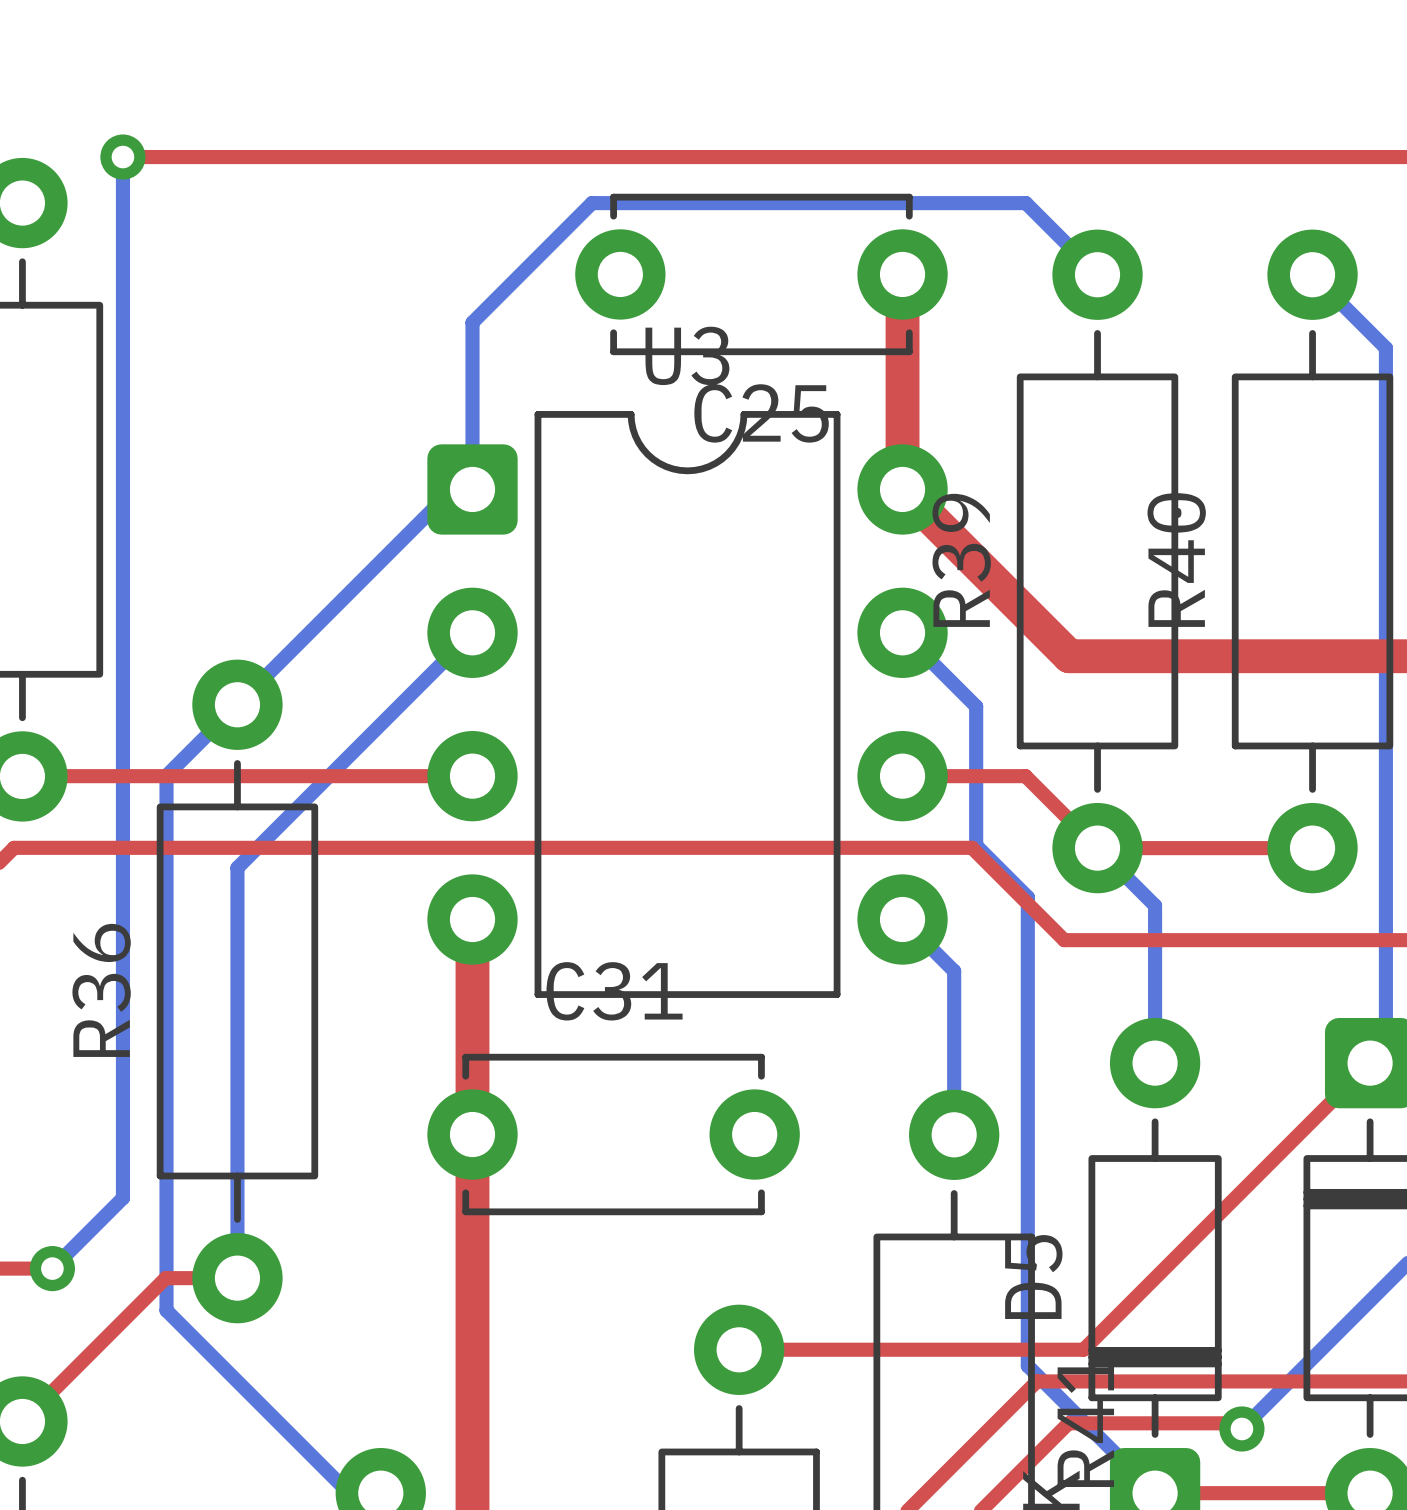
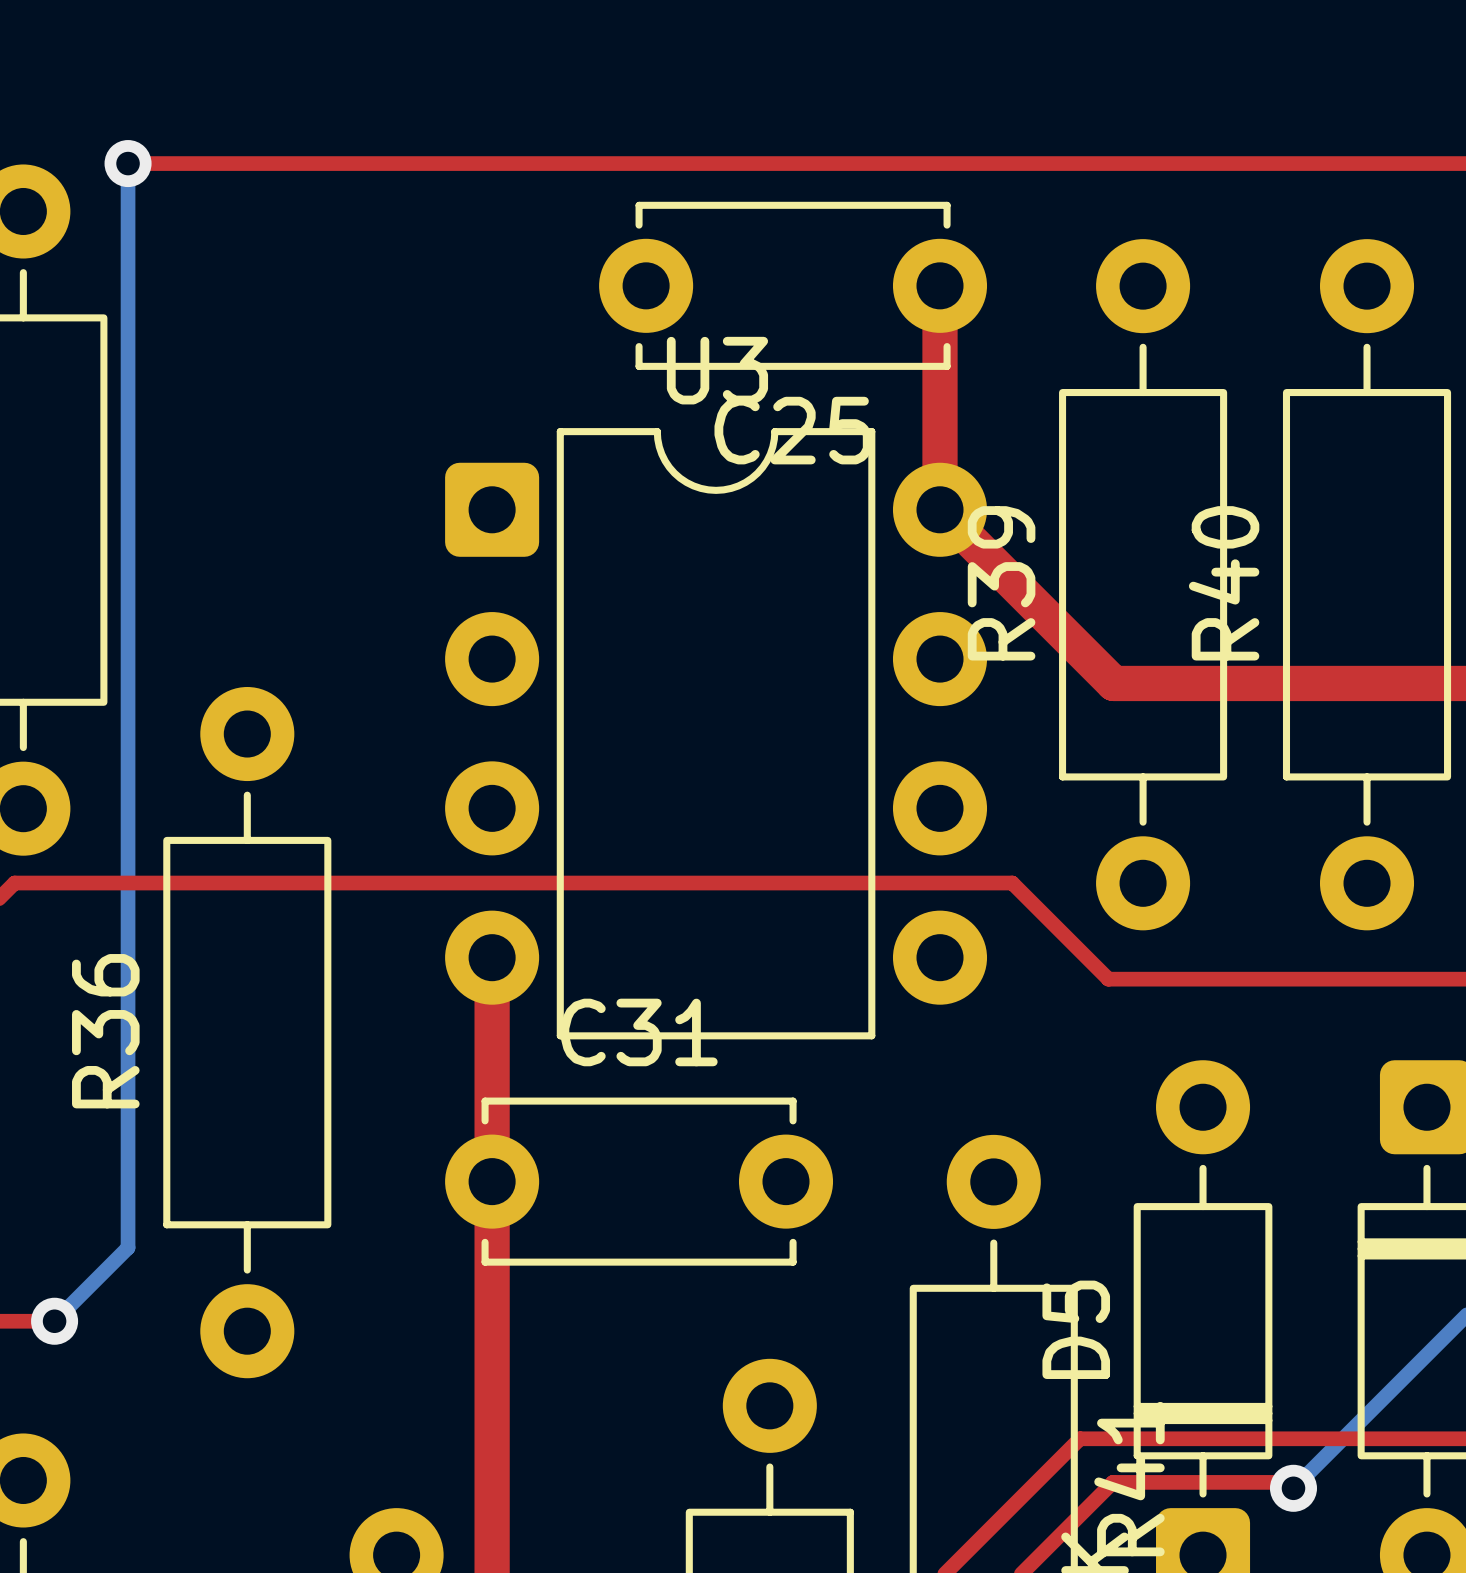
bottom track: (1097, 274) (1025, 203) (592, 203) (472, 322) (472, 489) (452, 489) (166, 775) (166, 1310) (349, 1493) (380, 1493) -> none
bottom track: (1312, 274) (1385, 348) (1385, 1047) (1370, 1063) -> none
bottom track: (472, 632) (237, 867) (237, 1278) -> none
bottom track: (902, 632) (976, 706) (976, 845) (1027, 897) (1027, 1365) (1155, 1493) -> none
top track: (22, 776) (472, 776) -> none
top track: (902, 776) (1025, 776) (1097, 848) (1312, 848) -> none
bottom track: (1097, 848) (1155, 905) (1155, 1063) -> none
bottom track: (902, 919) (954, 971) (954, 1134) -> none
top track: (1370, 1063) (1083, 1349) (739, 1349) -> none
top track: (237, 1278) (165, 1278) (22, 1421) -> none
top track: (1155, 1493) (1370, 1493) -> none

